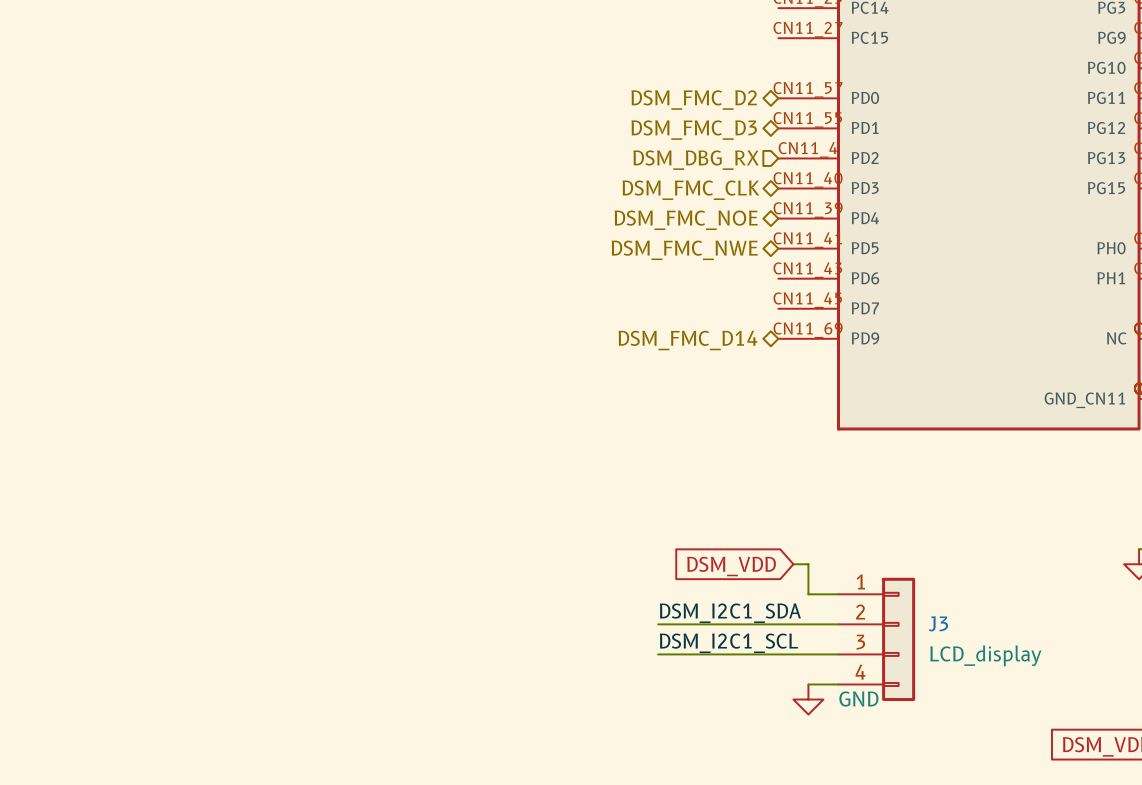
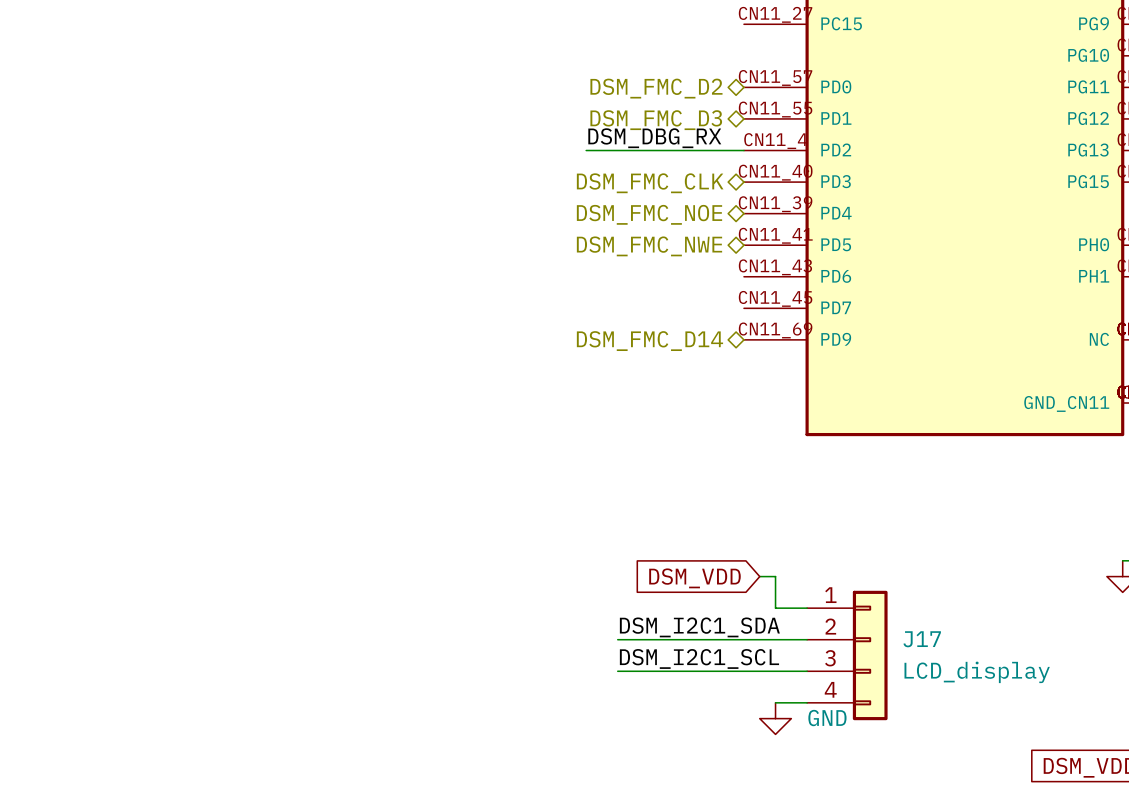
label: none -> DSM_DBG_RX (654, 138)
wire: none -> (586, 150) (743, 150)
hierarchical label: DSM_DBG_RX (696, 160) -> none
J3 name: J3 (938, 623) -> J17 (922, 639)

